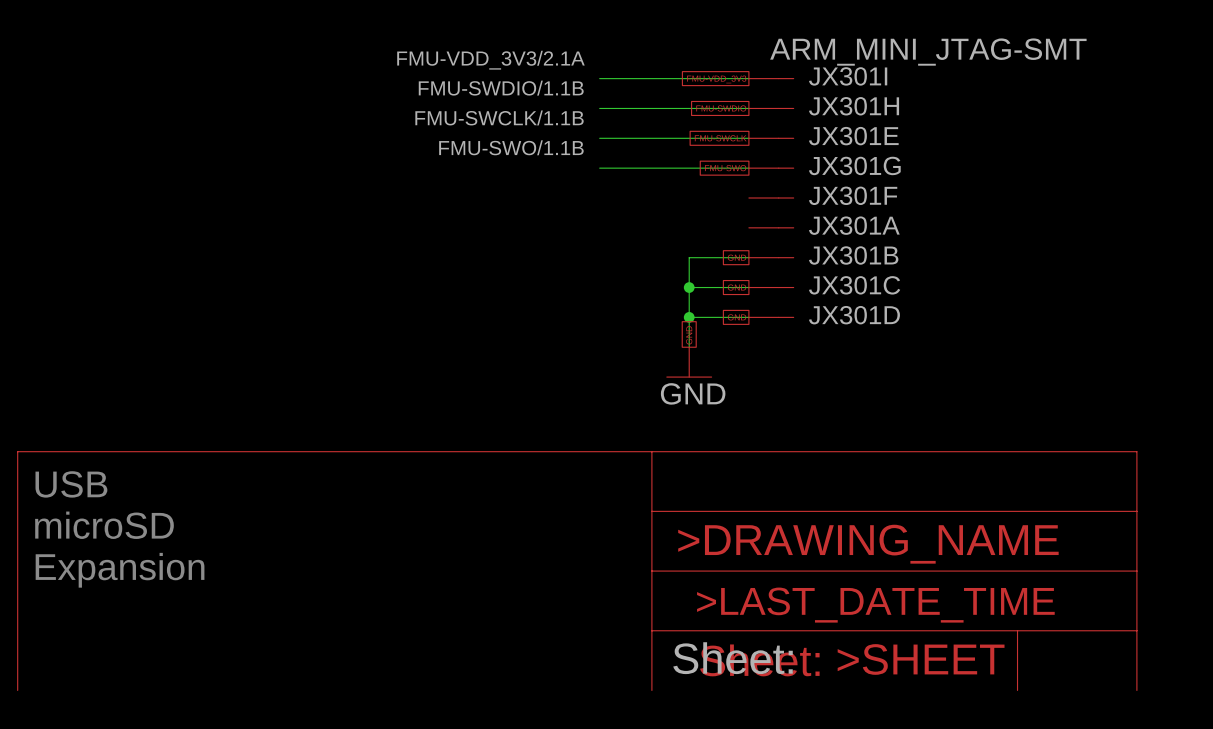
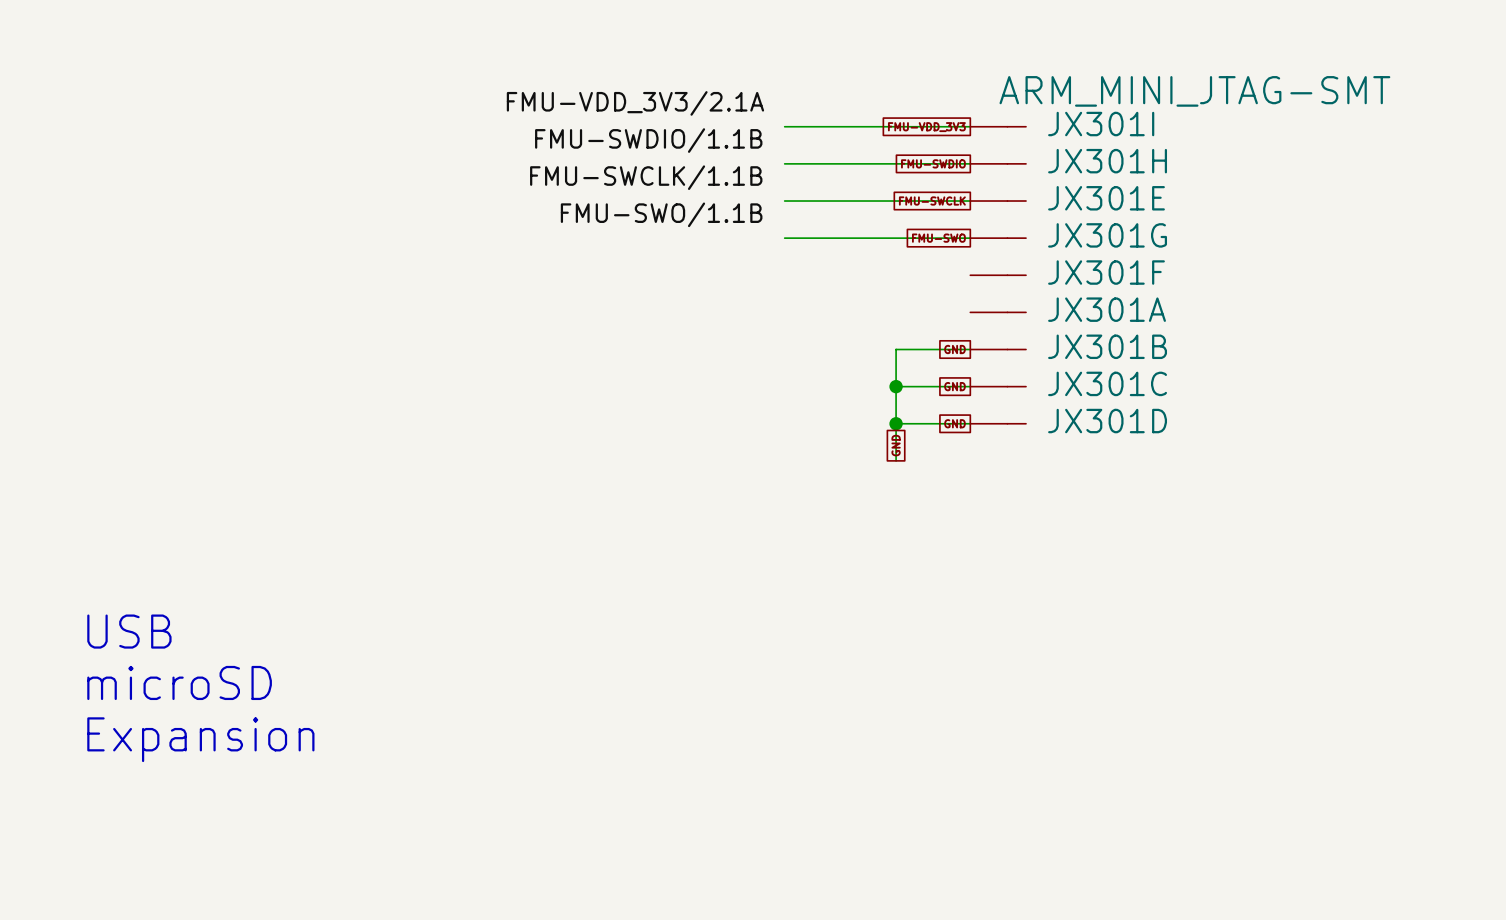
power symbol: GND (689, 362) -> none
power symbol: Sheet: (577, 571) -> none

